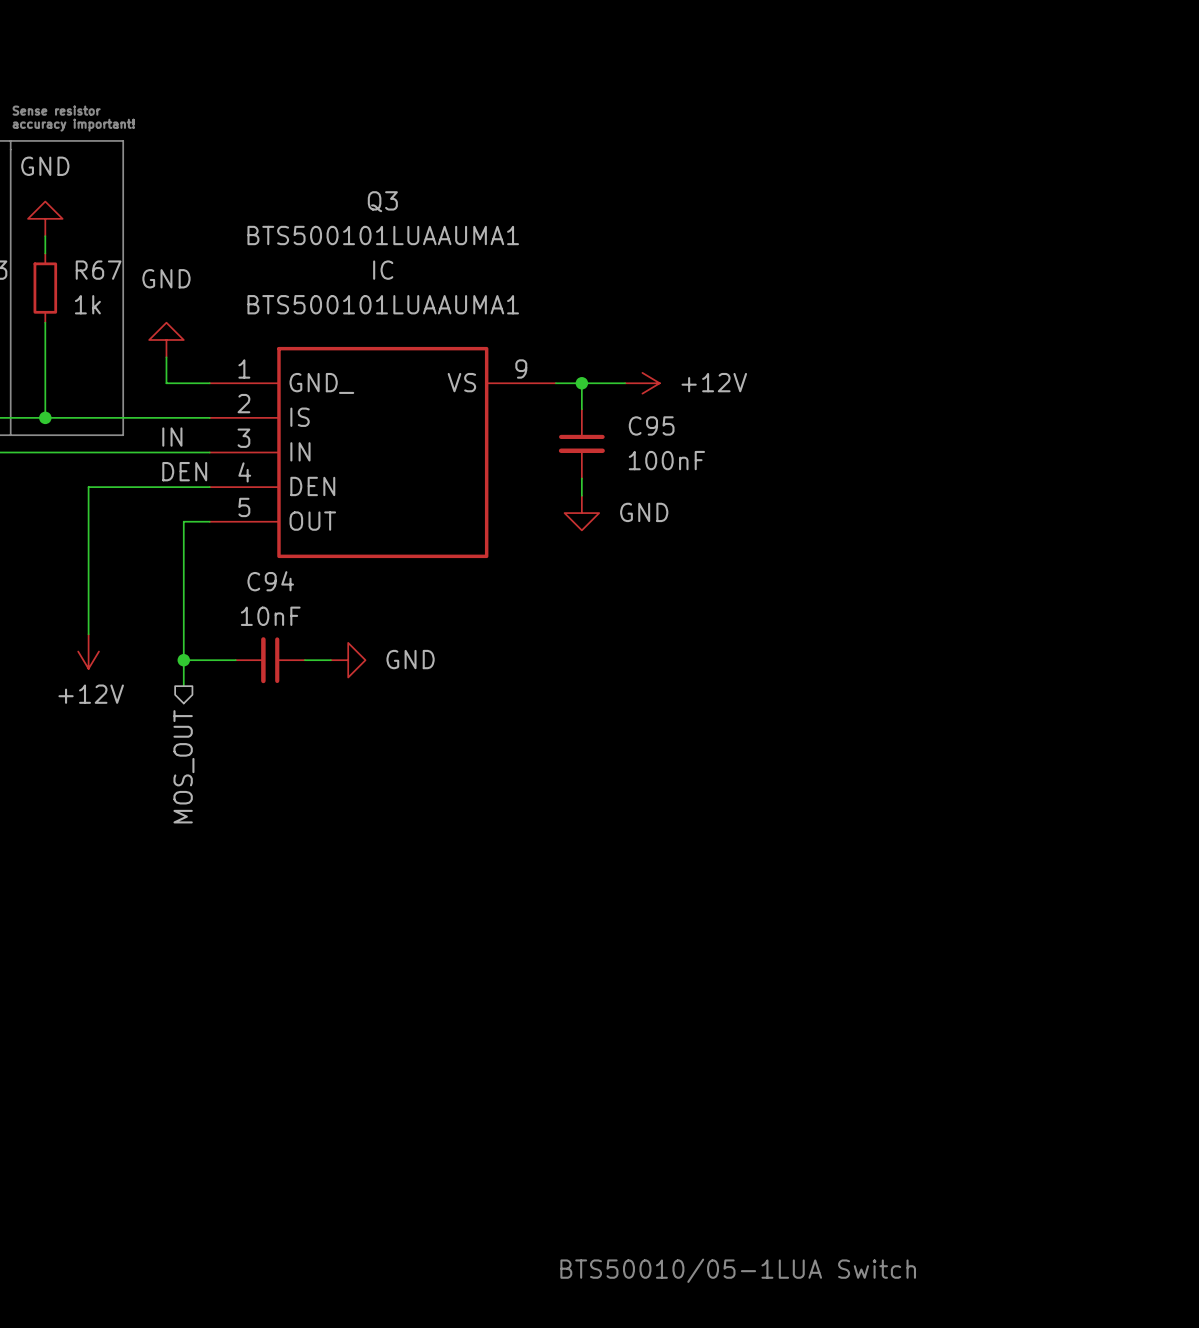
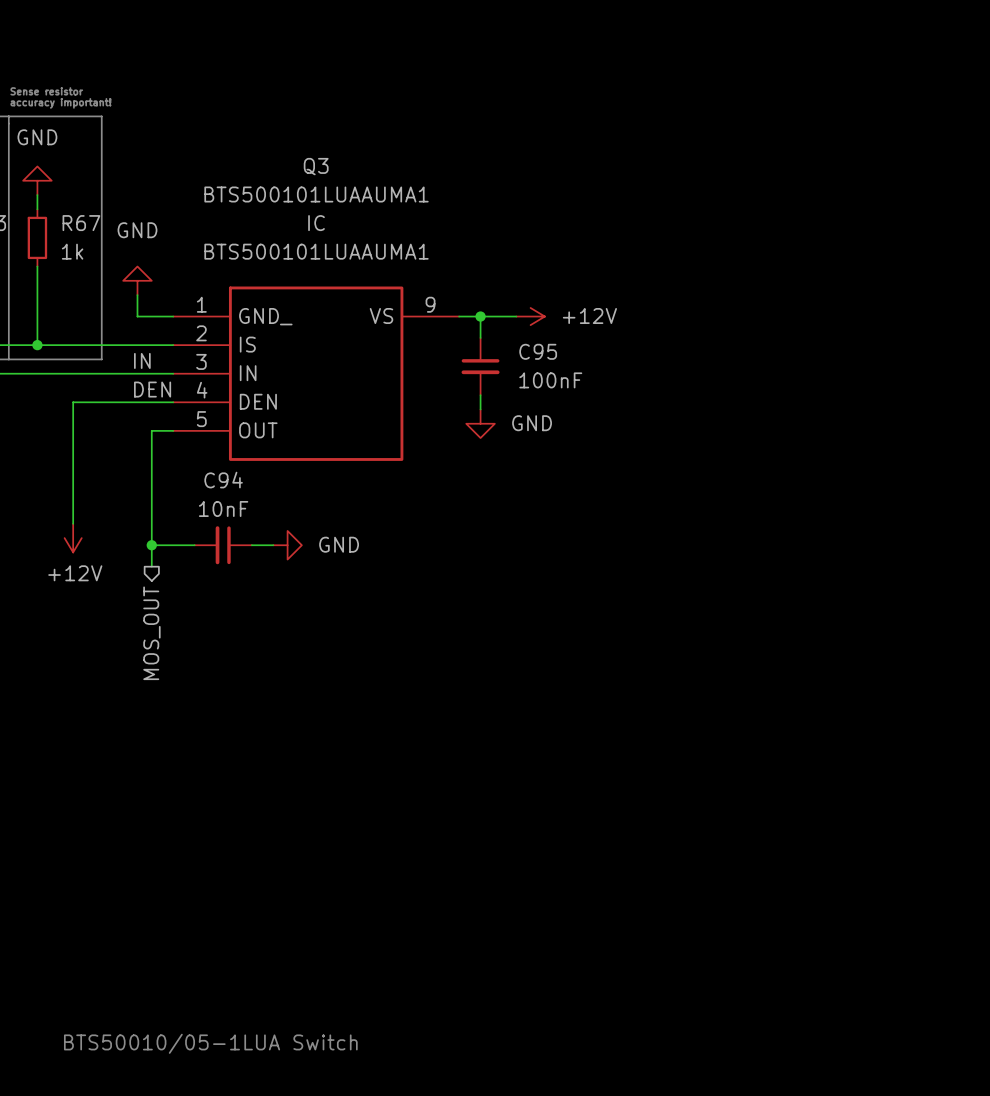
text: none -> BTS50010/05-1LUA Switch (210, 1043)
text: BTS50010/05-1LUA Switch (738, 1270) -> none

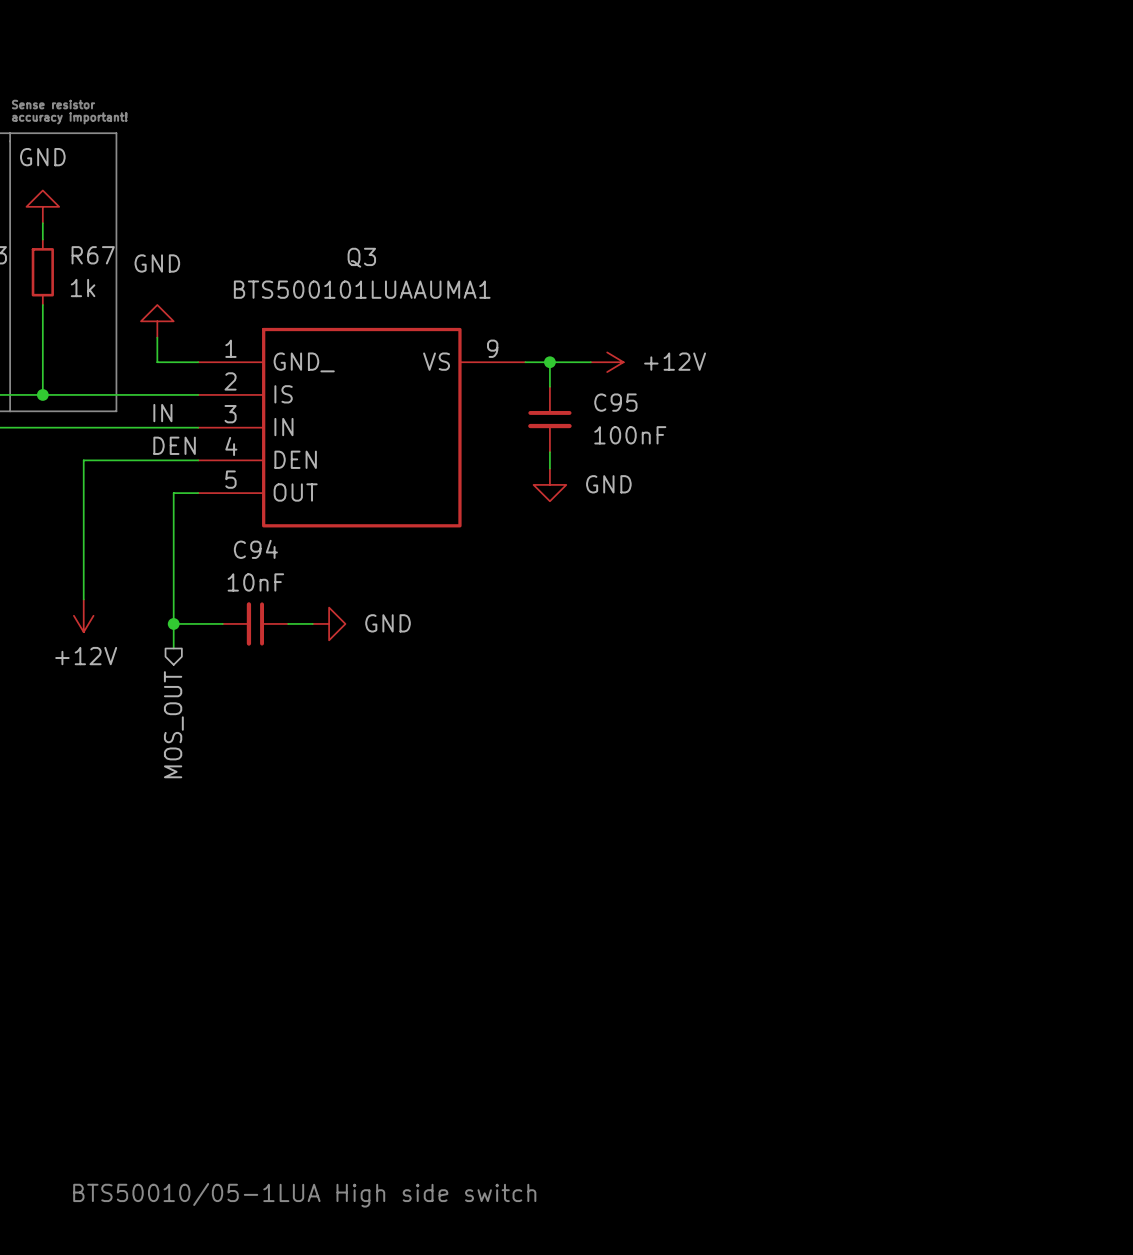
Q3 name position: Q3 (316, 166) -> Q3 (361, 257)
Q3 value position: BTS500101LUAAUMA1 (316, 194) -> BTS500101LUAAUMA1 (362, 289)
Q3 text: IC (316, 223) -> none
Q3 text: BTS500101LUAAUMA1 (316, 251) -> none
text: BTS50010/05-1LUA Switch (210, 1043) -> BTS50010/05-1LUA High side switch (304, 1195)

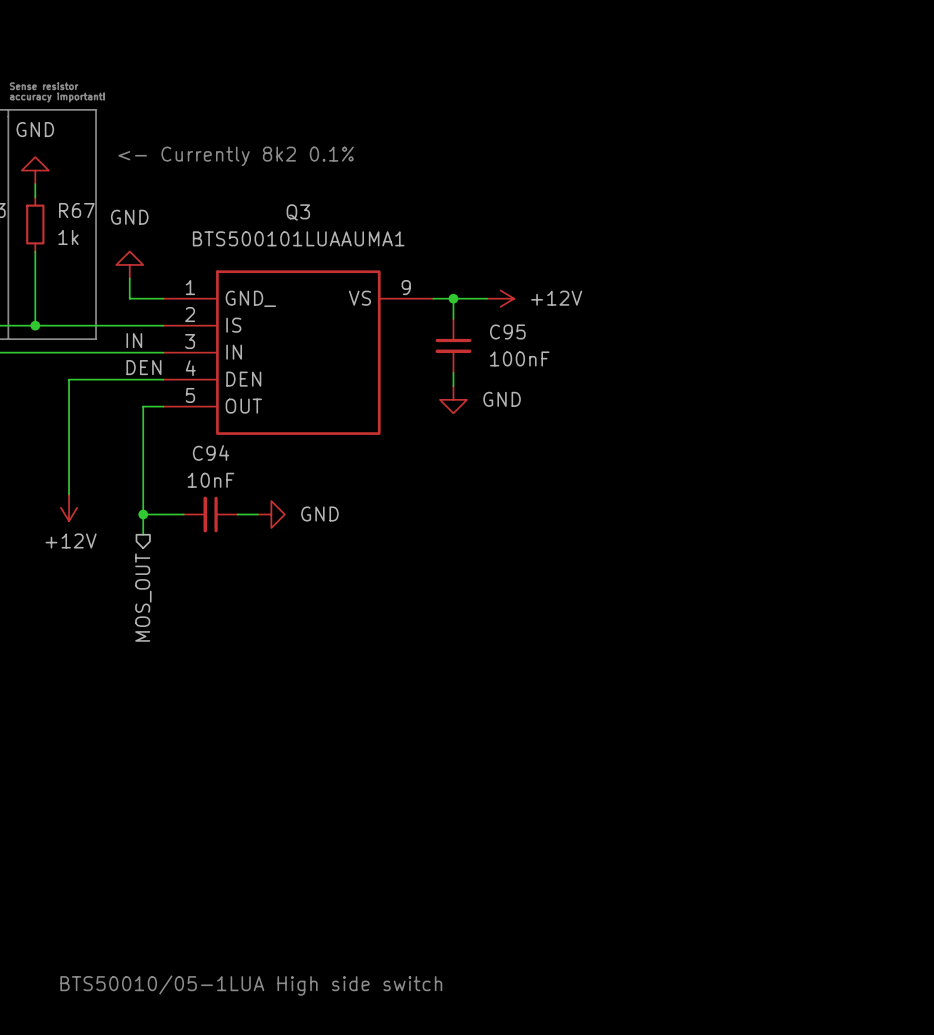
text: none -> <- Currently 8k2 0.1% (236, 156)

